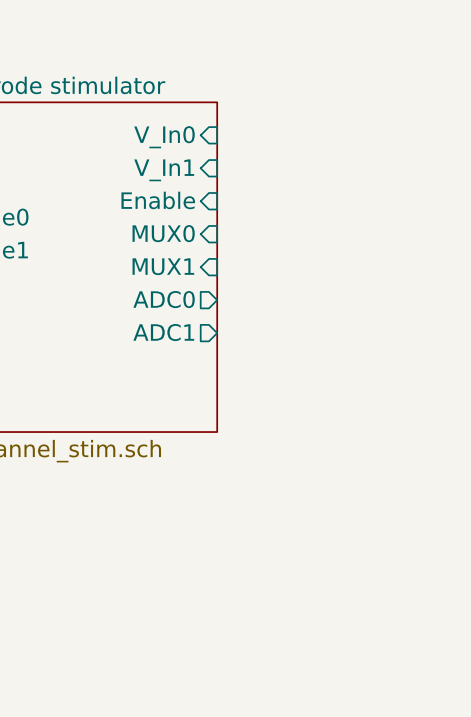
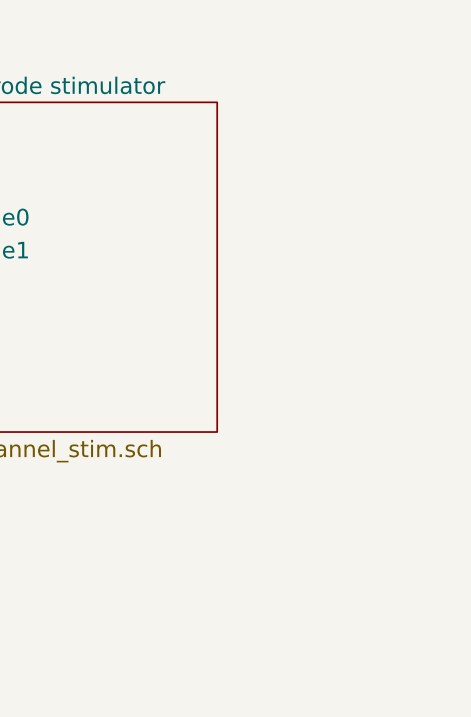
sheet pin: V_In0 (164, 137) -> none
sheet pin: V_In1 (164, 170) -> none
sheet pin: Enable (158, 200) -> none
sheet pin: MUX0 (163, 233) -> none
sheet pin: MUX1 (163, 266) -> none
sheet pin: ADC0 (164, 299) -> none
sheet pin: ADC1 (163, 332) -> none

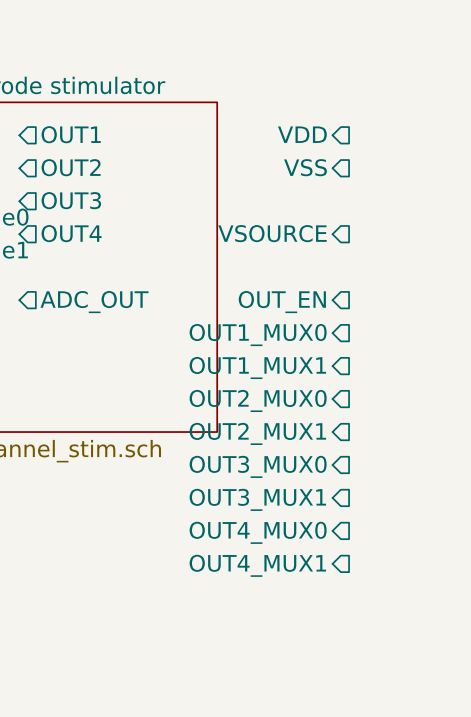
sheet pin: none -> OUT1 (71, 134)
sheet pin: none -> VDD (302, 134)
sheet pin: none -> OUT2 (71, 167)
sheet pin: none -> VSS (305, 167)
sheet pin: none -> OUT3 (71, 200)
sheet pin: none -> OUT4 (71, 233)
sheet pin: none -> VSOURCE (272, 233)
sheet pin: none -> ADC_OUT (94, 302)
sheet pin: none -> OUT_EN (282, 302)
sheet pin: none -> OUT1_MUX0 (258, 335)
sheet pin: none -> OUT1_MUX1 (257, 367)
sheet pin: none -> OUT2_MUX0 (258, 400)
sheet pin: none -> OUT2_MUX1 (257, 433)
sheet pin: none -> OUT3_MUX0 (258, 466)
sheet pin: none -> OUT3_MUX1 (257, 499)
sheet pin: none -> OUT4_MUX0 (258, 532)
sheet pin: none -> OUT4_MUX1 (257, 565)

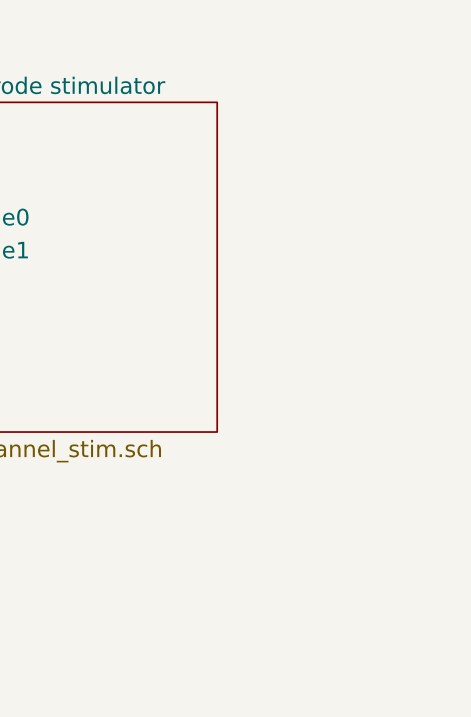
sheet pin: OUT1 (71, 134) -> none
sheet pin: VDD (302, 134) -> none
sheet pin: OUT2 (71, 167) -> none
sheet pin: VSS (305, 167) -> none
sheet pin: OUT3 (71, 200) -> none
sheet pin: OUT4 (71, 233) -> none
sheet pin: VSOURCE (272, 233) -> none
sheet pin: ADC_OUT (94, 302) -> none
sheet pin: OUT_EN (282, 302) -> none
sheet pin: OUT1_MUX0 (258, 335) -> none
sheet pin: OUT1_MUX1 (257, 367) -> none
sheet pin: OUT2_MUX0 (258, 400) -> none
sheet pin: OUT2_MUX1 (257, 433) -> none
sheet pin: OUT3_MUX0 (258, 466) -> none
sheet pin: OUT3_MUX1 (257, 499) -> none
sheet pin: OUT4_MUX0 (258, 532) -> none
sheet pin: OUT4_MUX1 (257, 565) -> none

